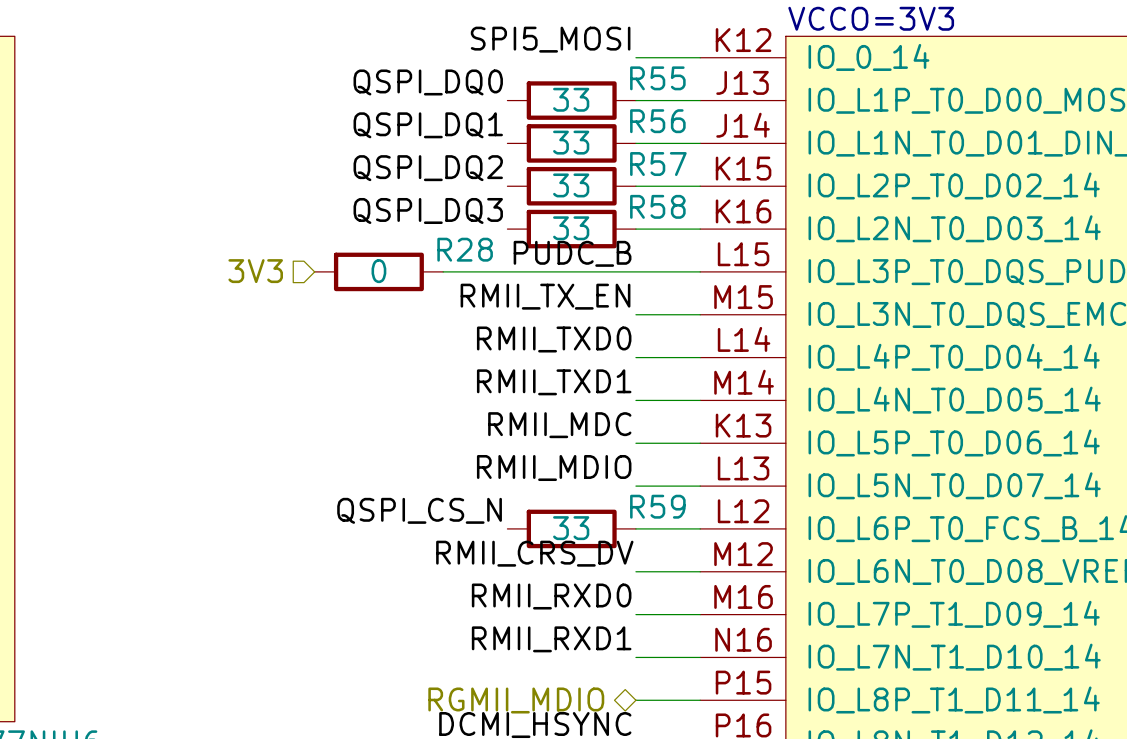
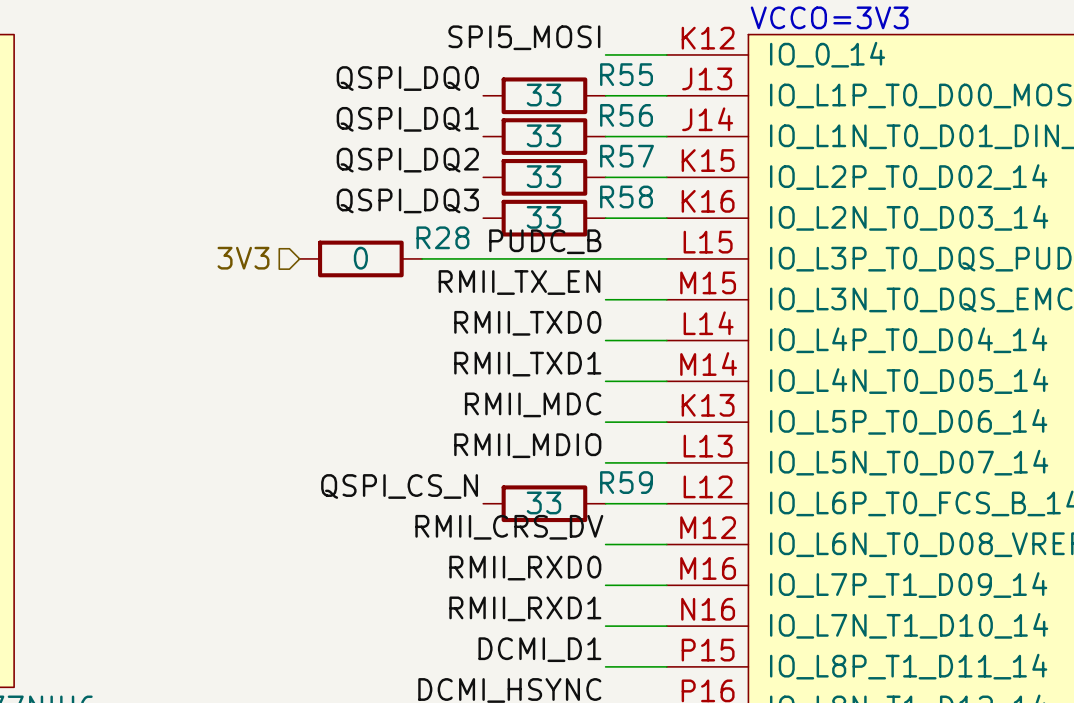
label: none -> DCMI_D1 (539, 649)
hierarchical label: RGMII_MDIO (516, 700) -> none

